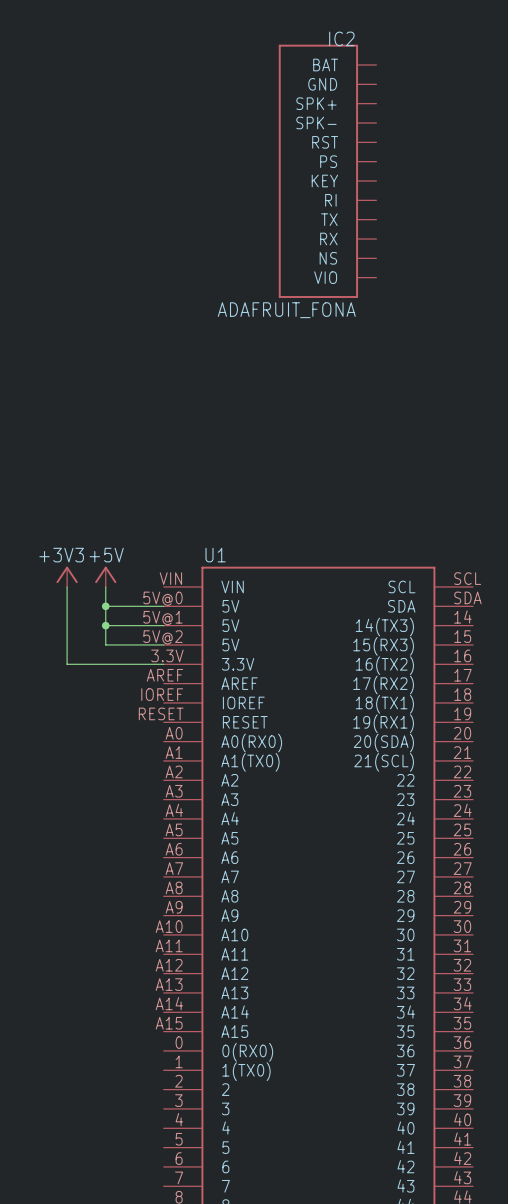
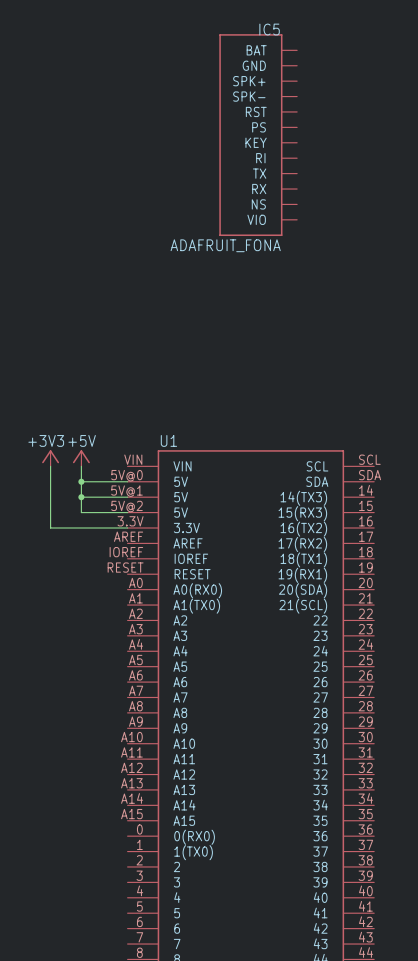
IC2 name: IC2 (341, 38) -> IC5 (269, 29)

